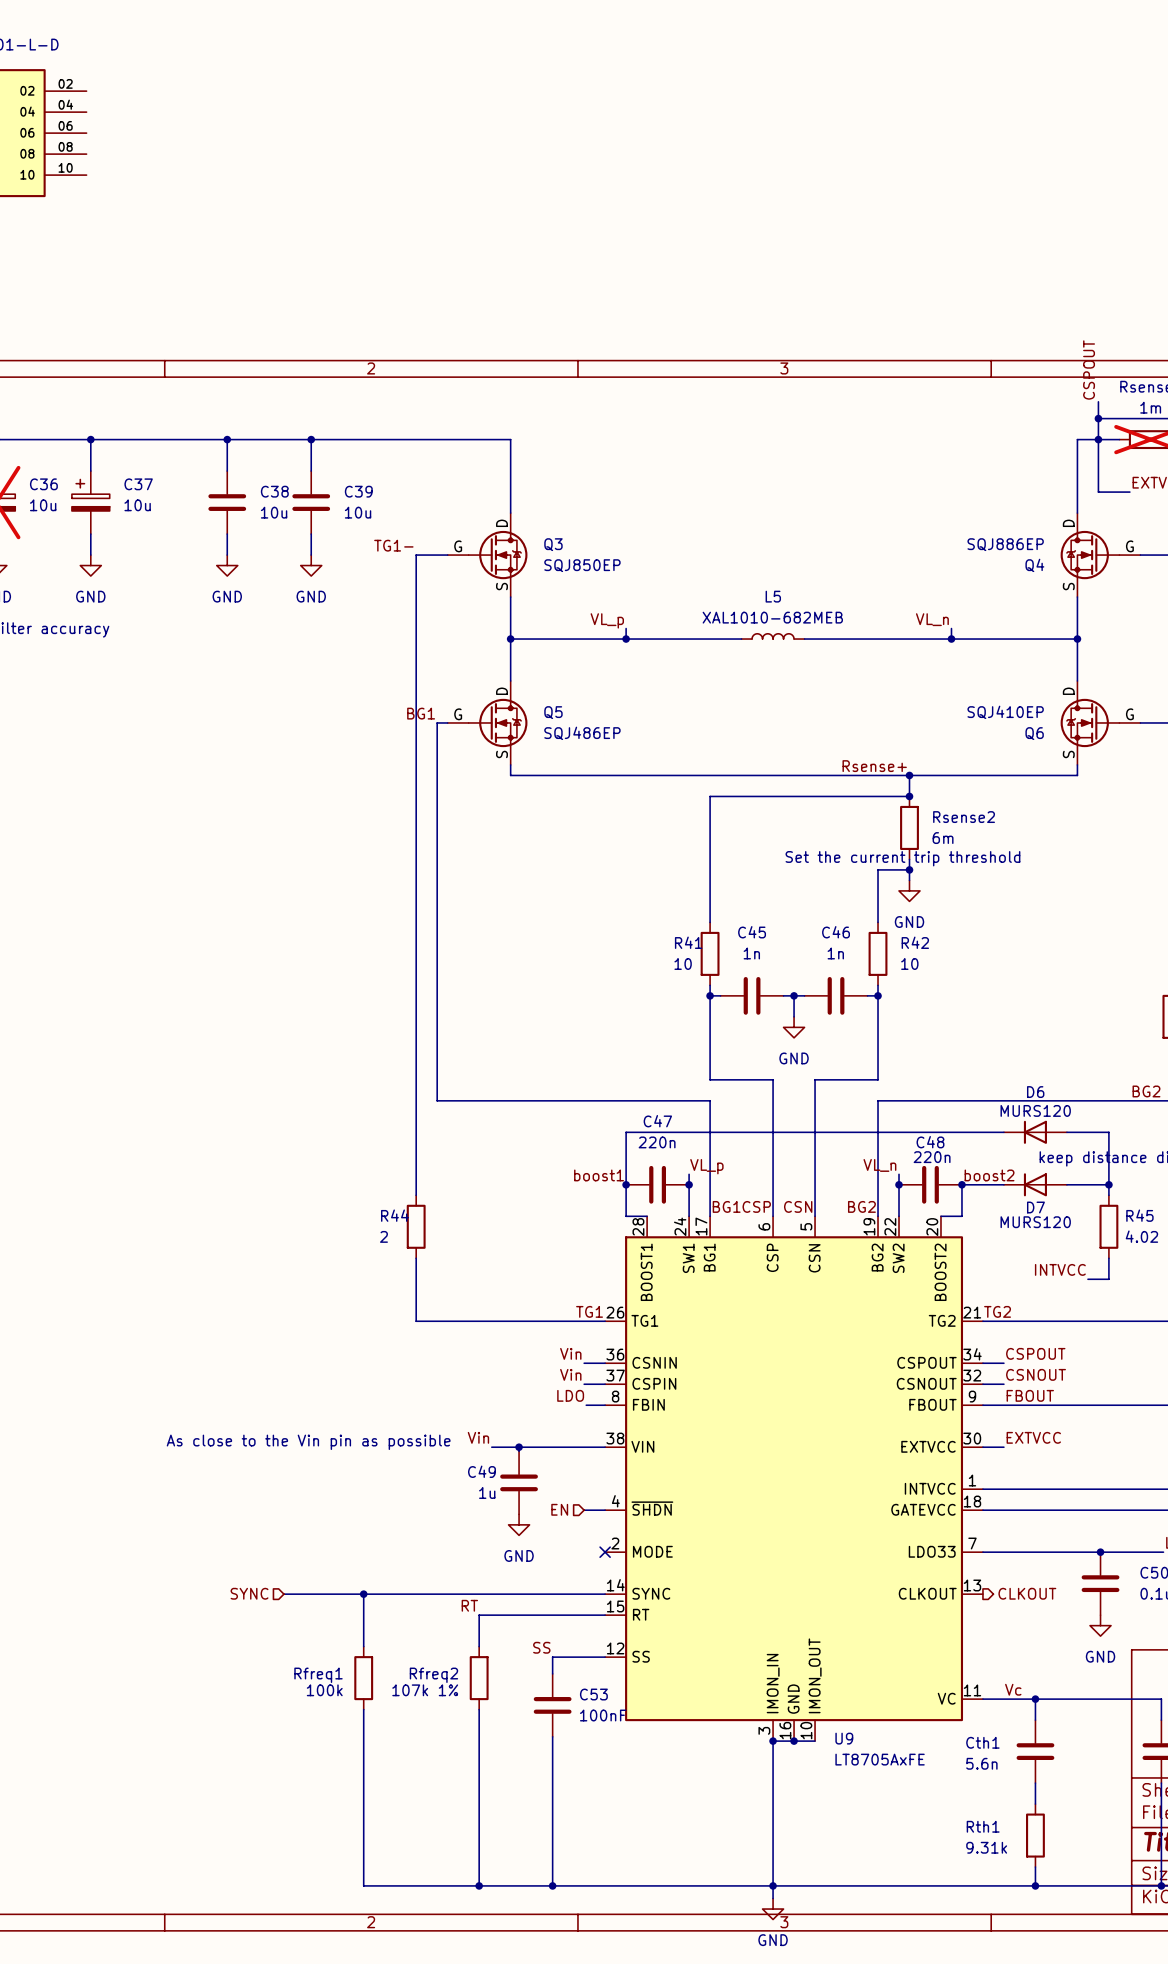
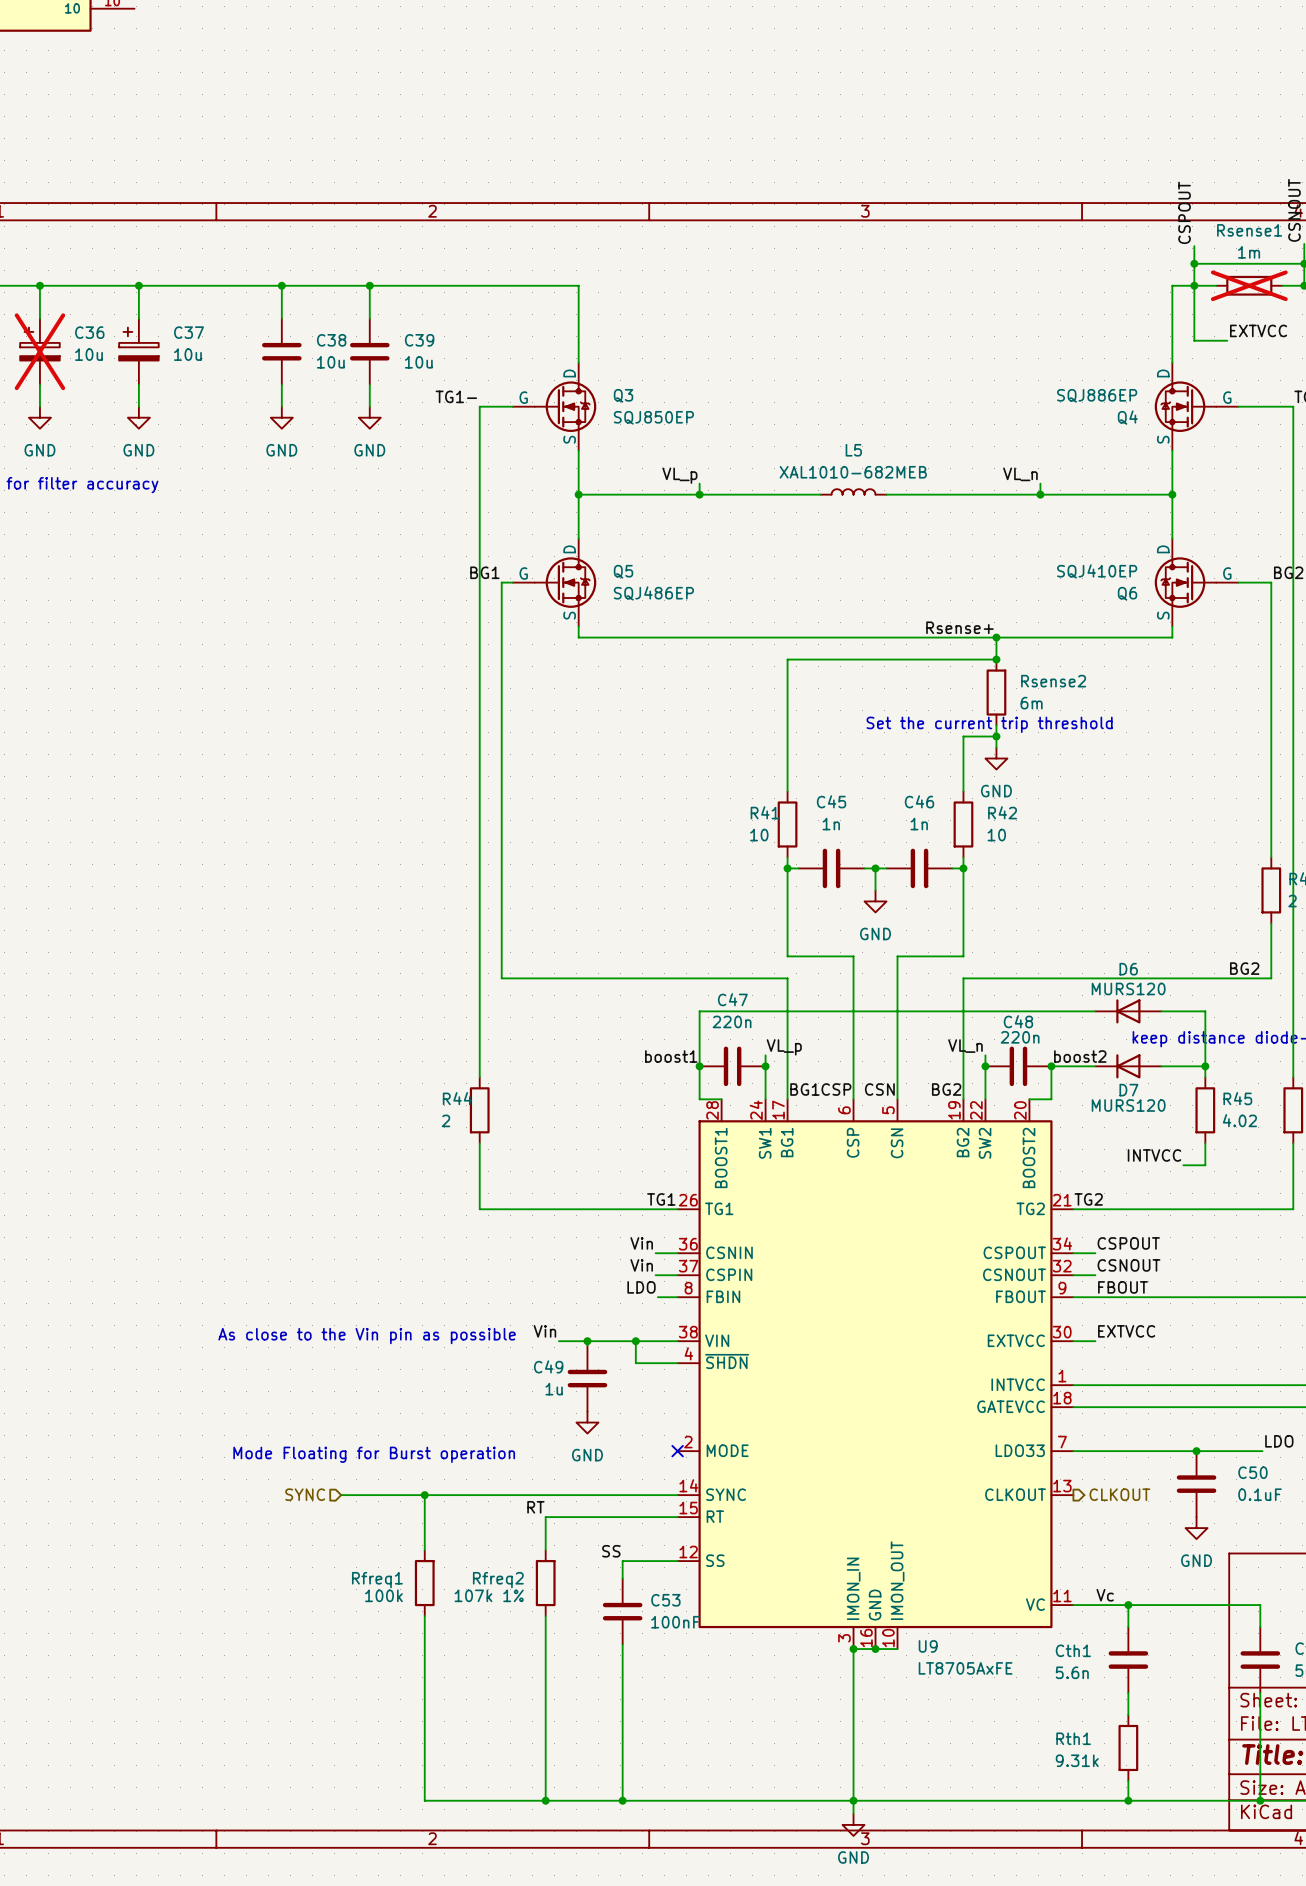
U9 symbol: [605, 1216, 983, 1742] -> [677, 1099, 1074, 1650]
wire: none -> (635, 1341) (635, 1363) (677, 1363)
junction: none -> (635, 1341)
hierarchical label: EN (559, 1509) -> none
wire: (584, 1510) (605, 1510) -> none
text: none -> Mode Floating for Burst operation (374, 1454)

